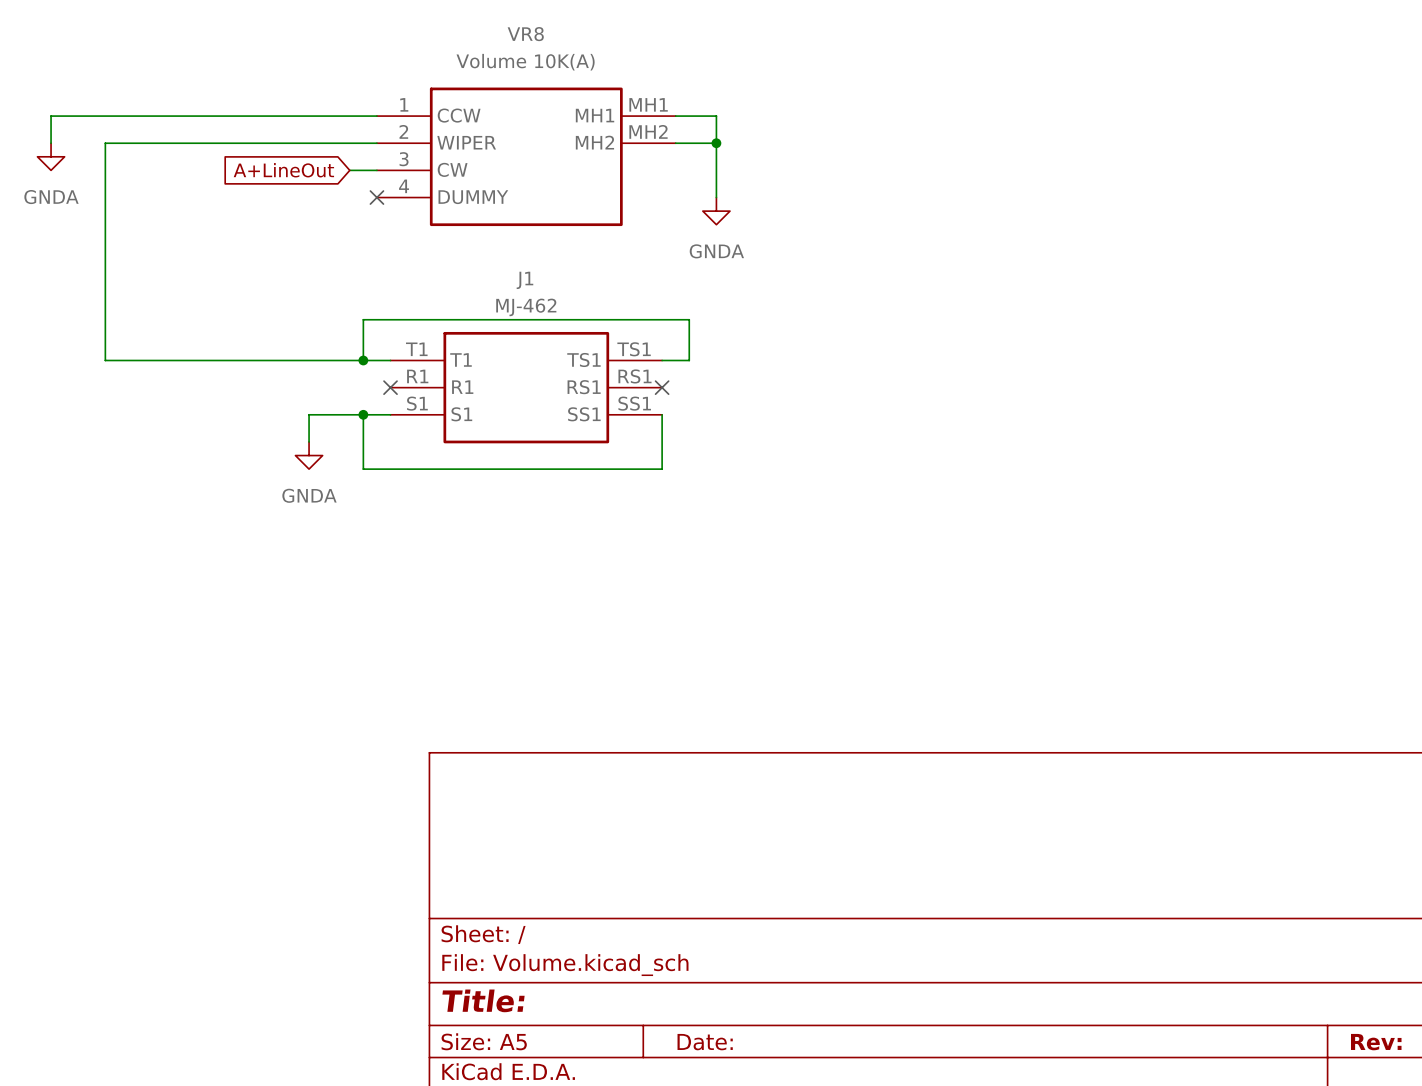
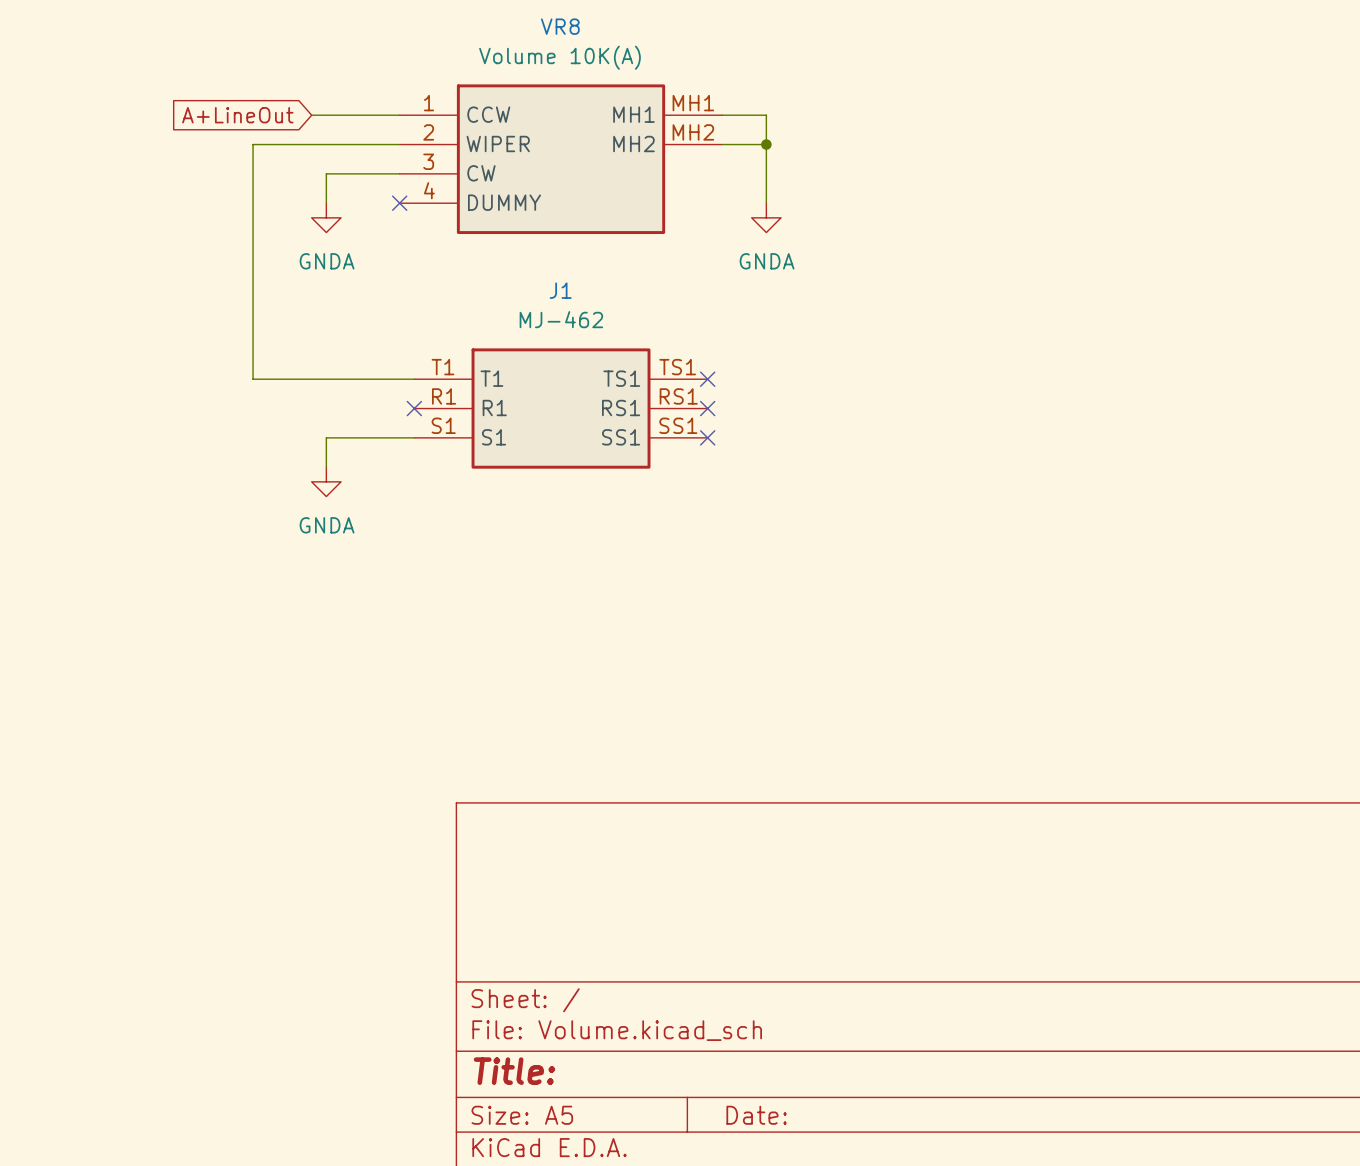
wire: (295, 116) (51, 116) (51, 143) -> none
wire: (241, 143) (105, 143) (105, 360) (241, 360) -> (253, 144) (253, 379)
power symbol position: GNDA (51, 156) -> GNDA (326, 217)
global label position: A+LineOut (283, 170) -> A+LineOut (237, 115)
wire: none -> (370, 173) (326, 173) (326, 203)
wire: (363, 360) (363, 319) (689, 319) (689, 360) (662, 360) -> none
junction: (363, 360) -> none
no-connect mark: none -> (707, 379)
wire: (363, 414) (363, 469) (662, 469) (662, 414) -> none
junction: (363, 414) -> none
no-connect mark: none -> (707, 437)

